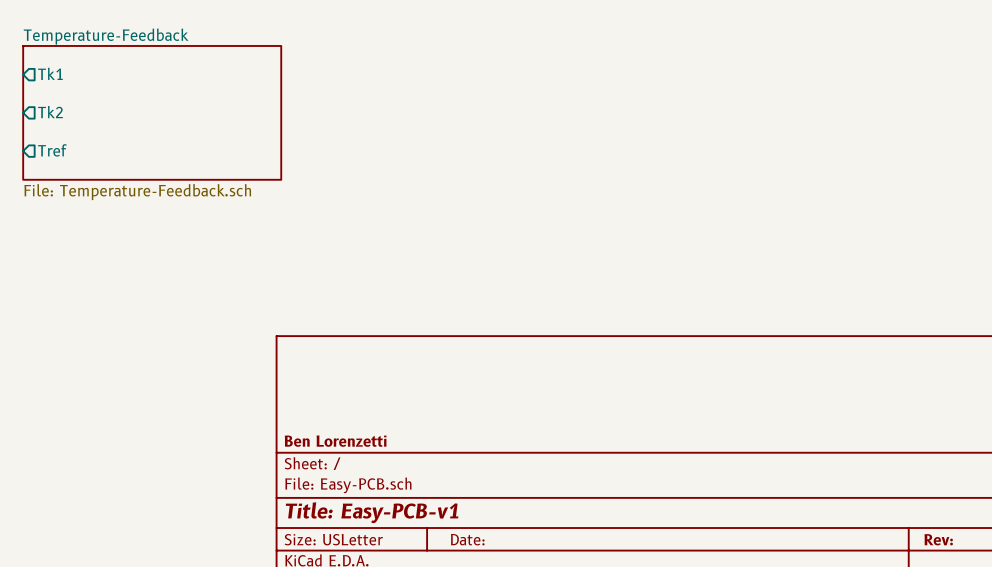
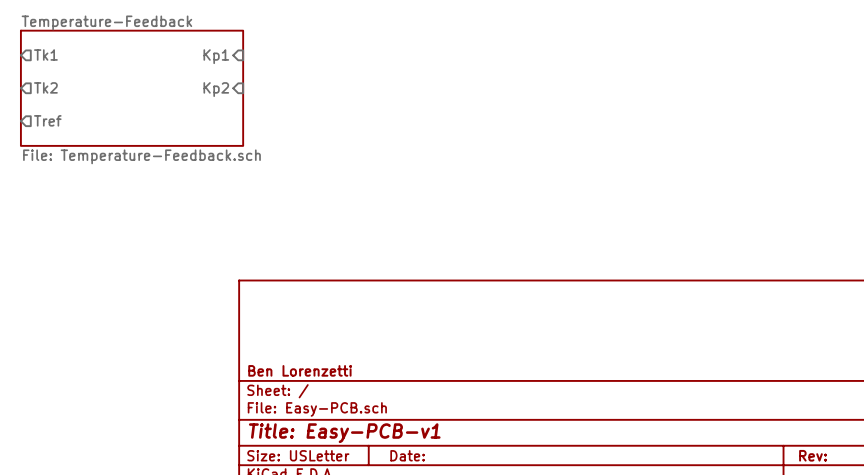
sheet pin: none -> Kp1 (216, 56)
sheet pin: none -> Kp2 (216, 89)

